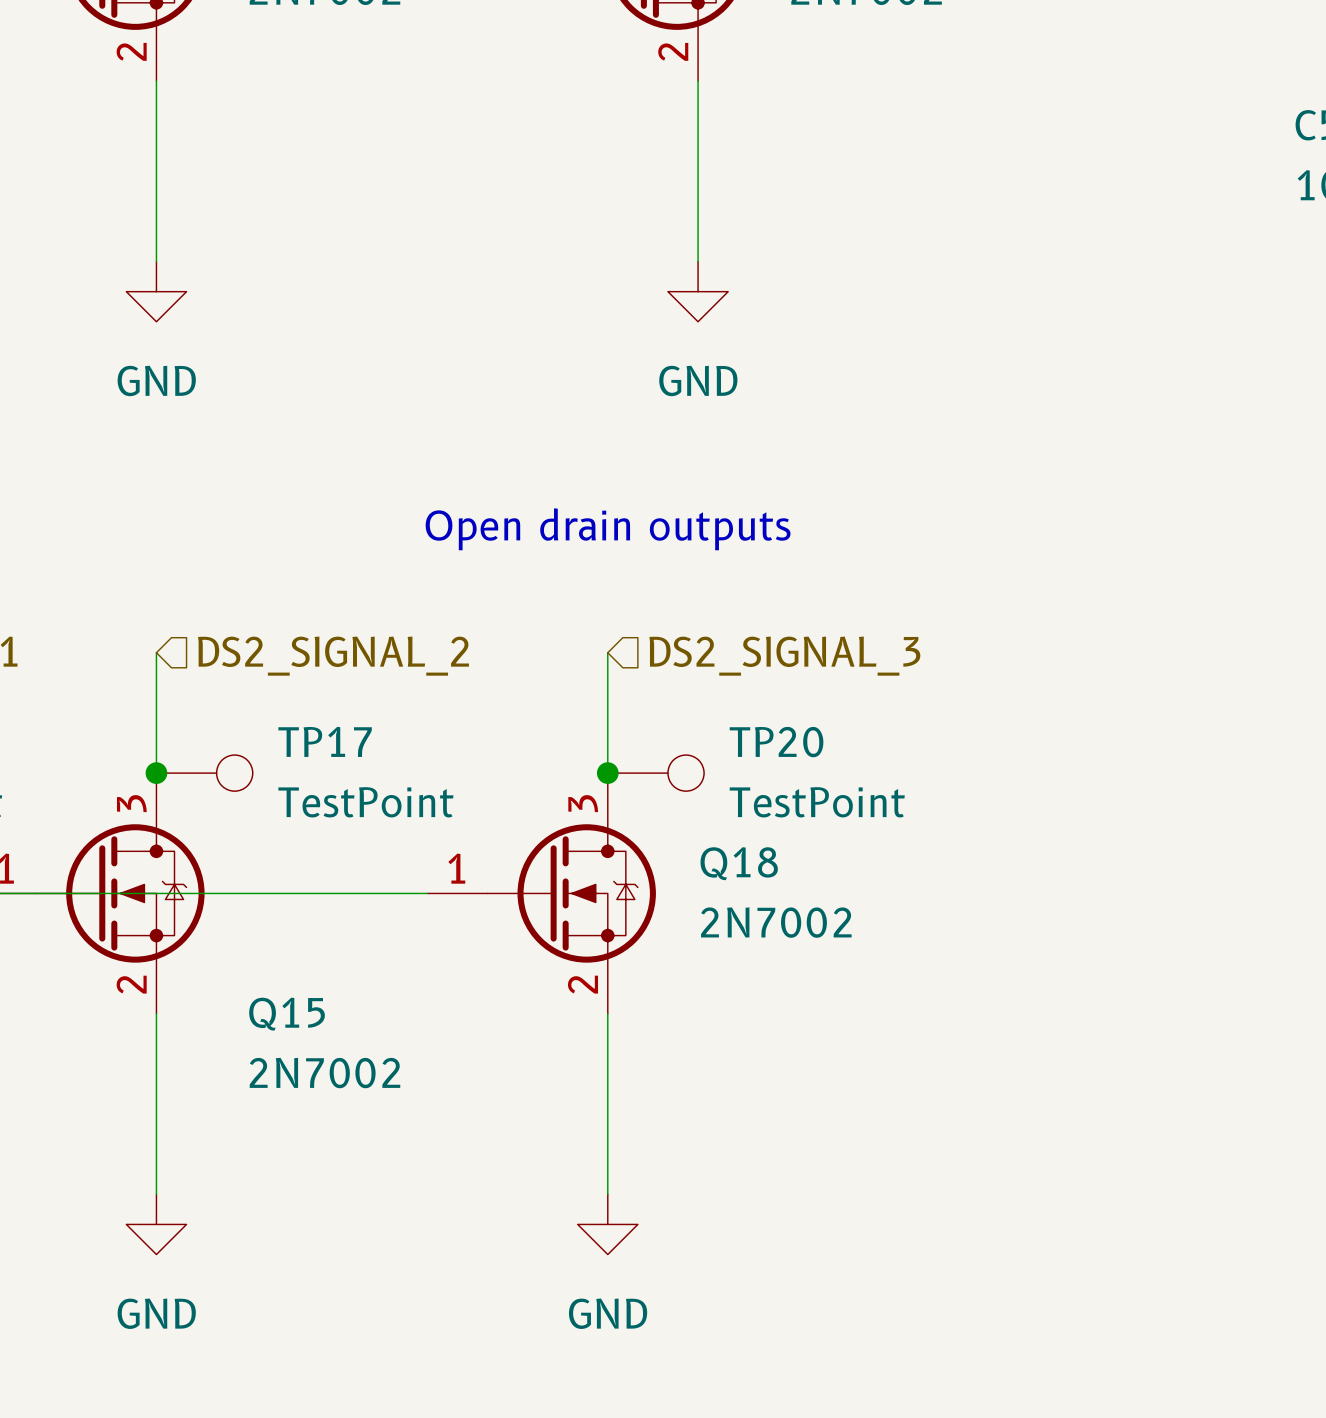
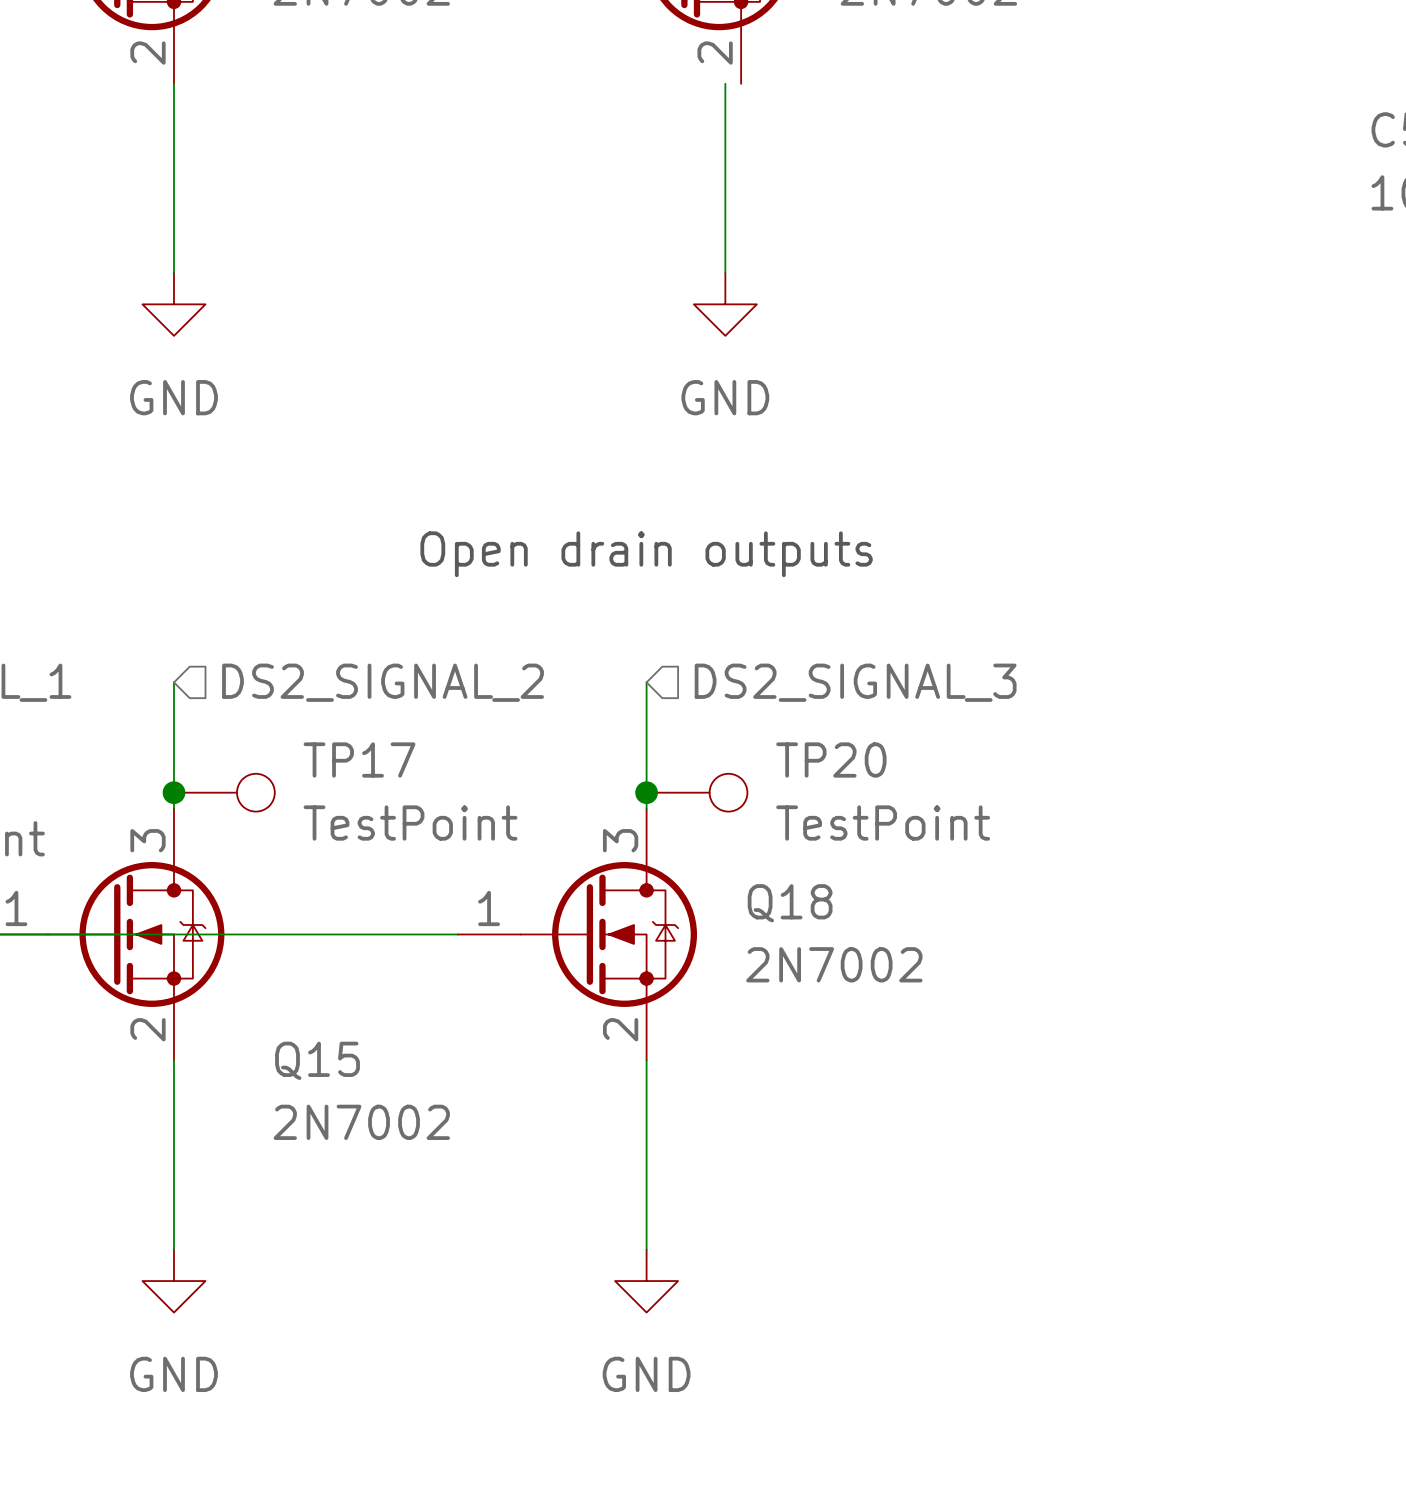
wire: (698, 81) (698, 261) -> (725, 83) (725, 272)
power symbol position: GND (698, 291) -> GND (725, 304)
junction position: (156, 773) -> (173, 792)
TP17 position: (204, 773) -> (224, 792)
junction position: (607, 773) -> (646, 792)
TP20 position: (655, 773) -> (697, 792)

